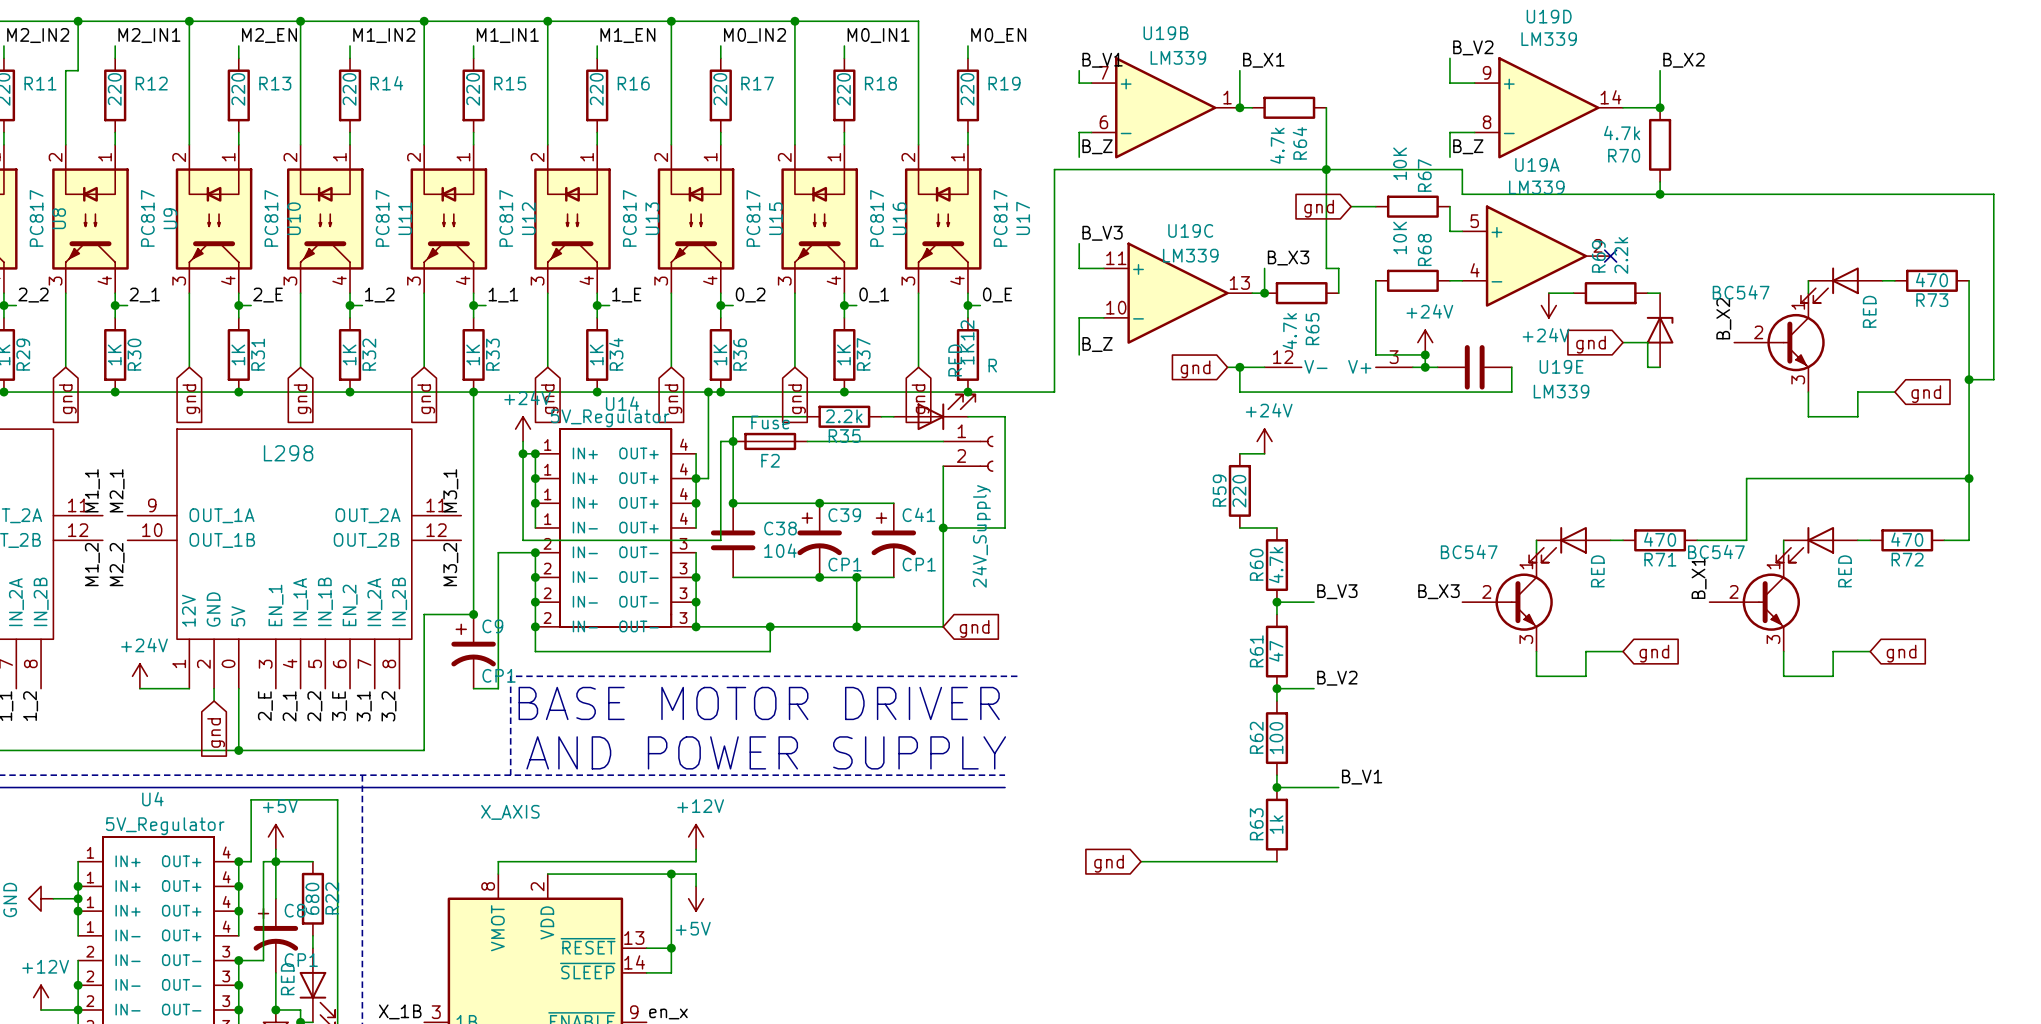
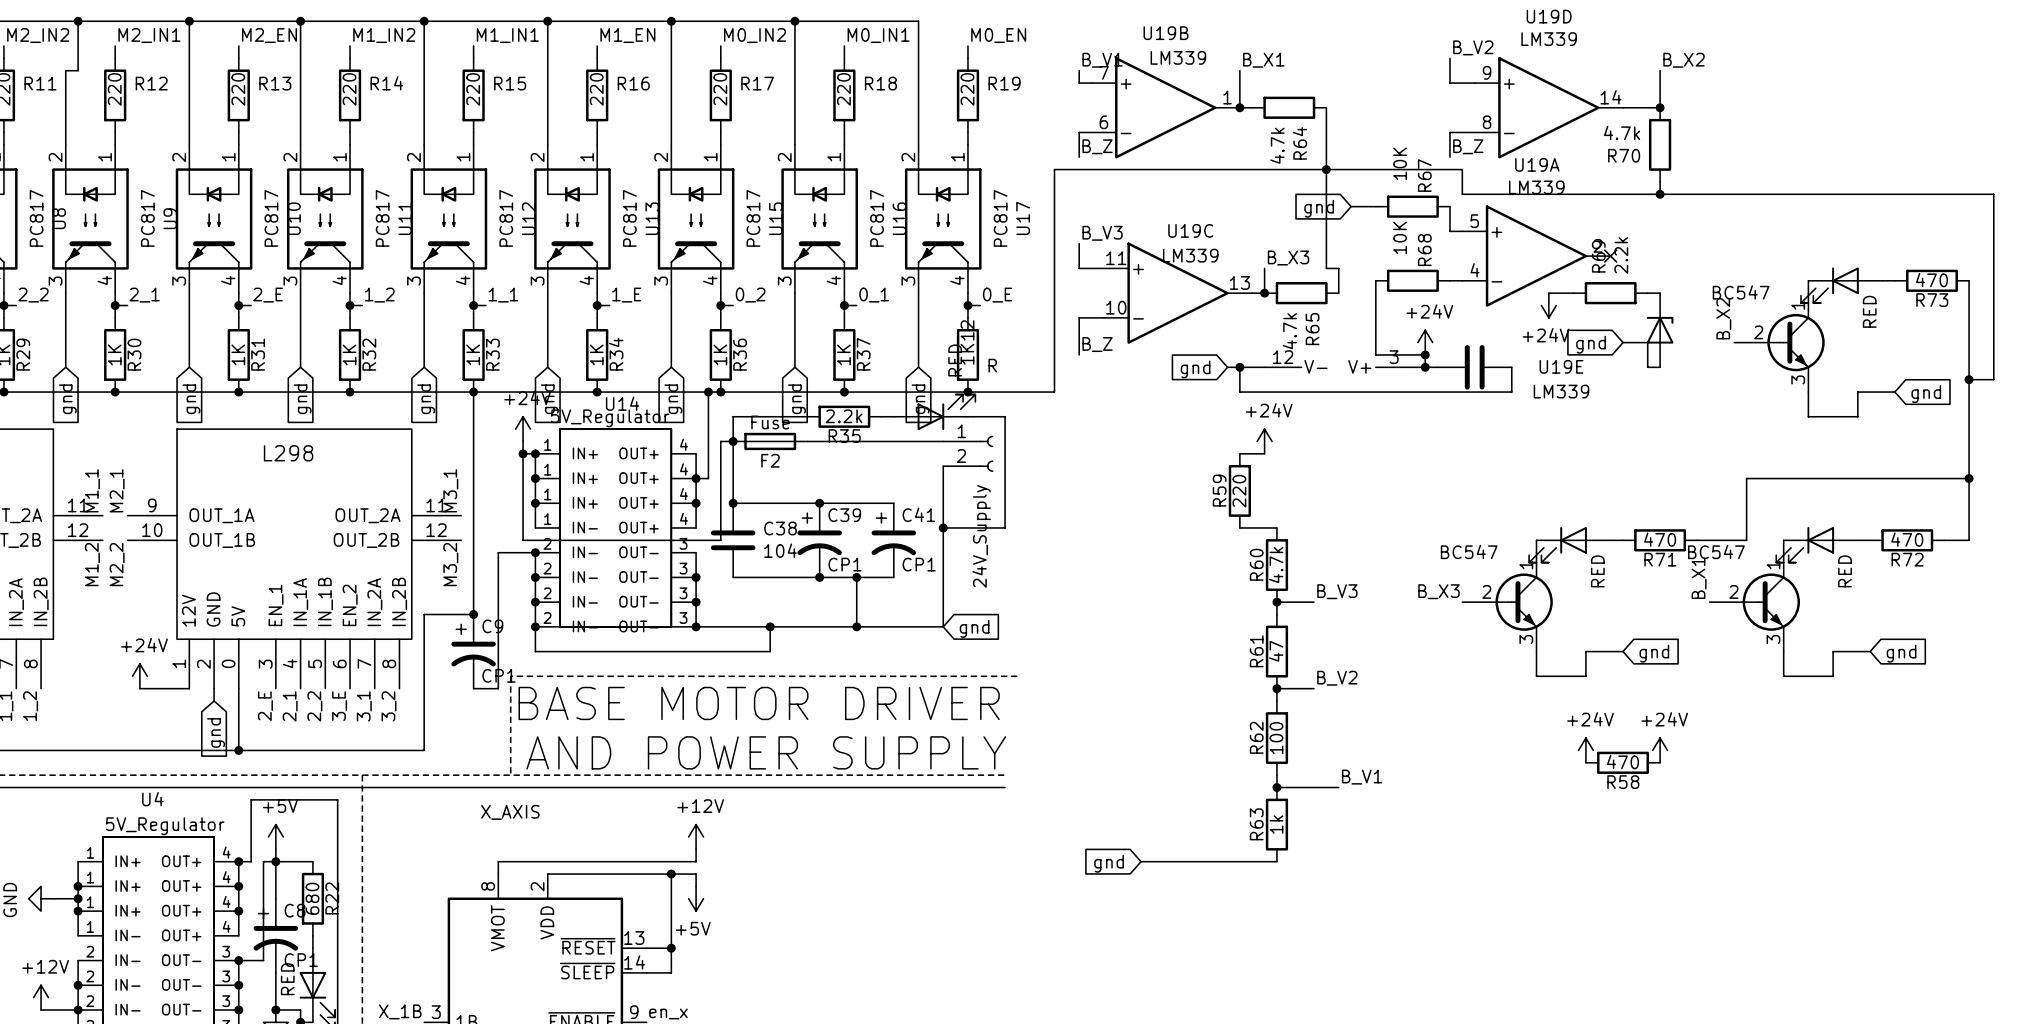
power symbol: none -> +24V (1585, 750)
power symbol: none -> +24V (1660, 750)
R58: none -> 470 (1623, 762)

